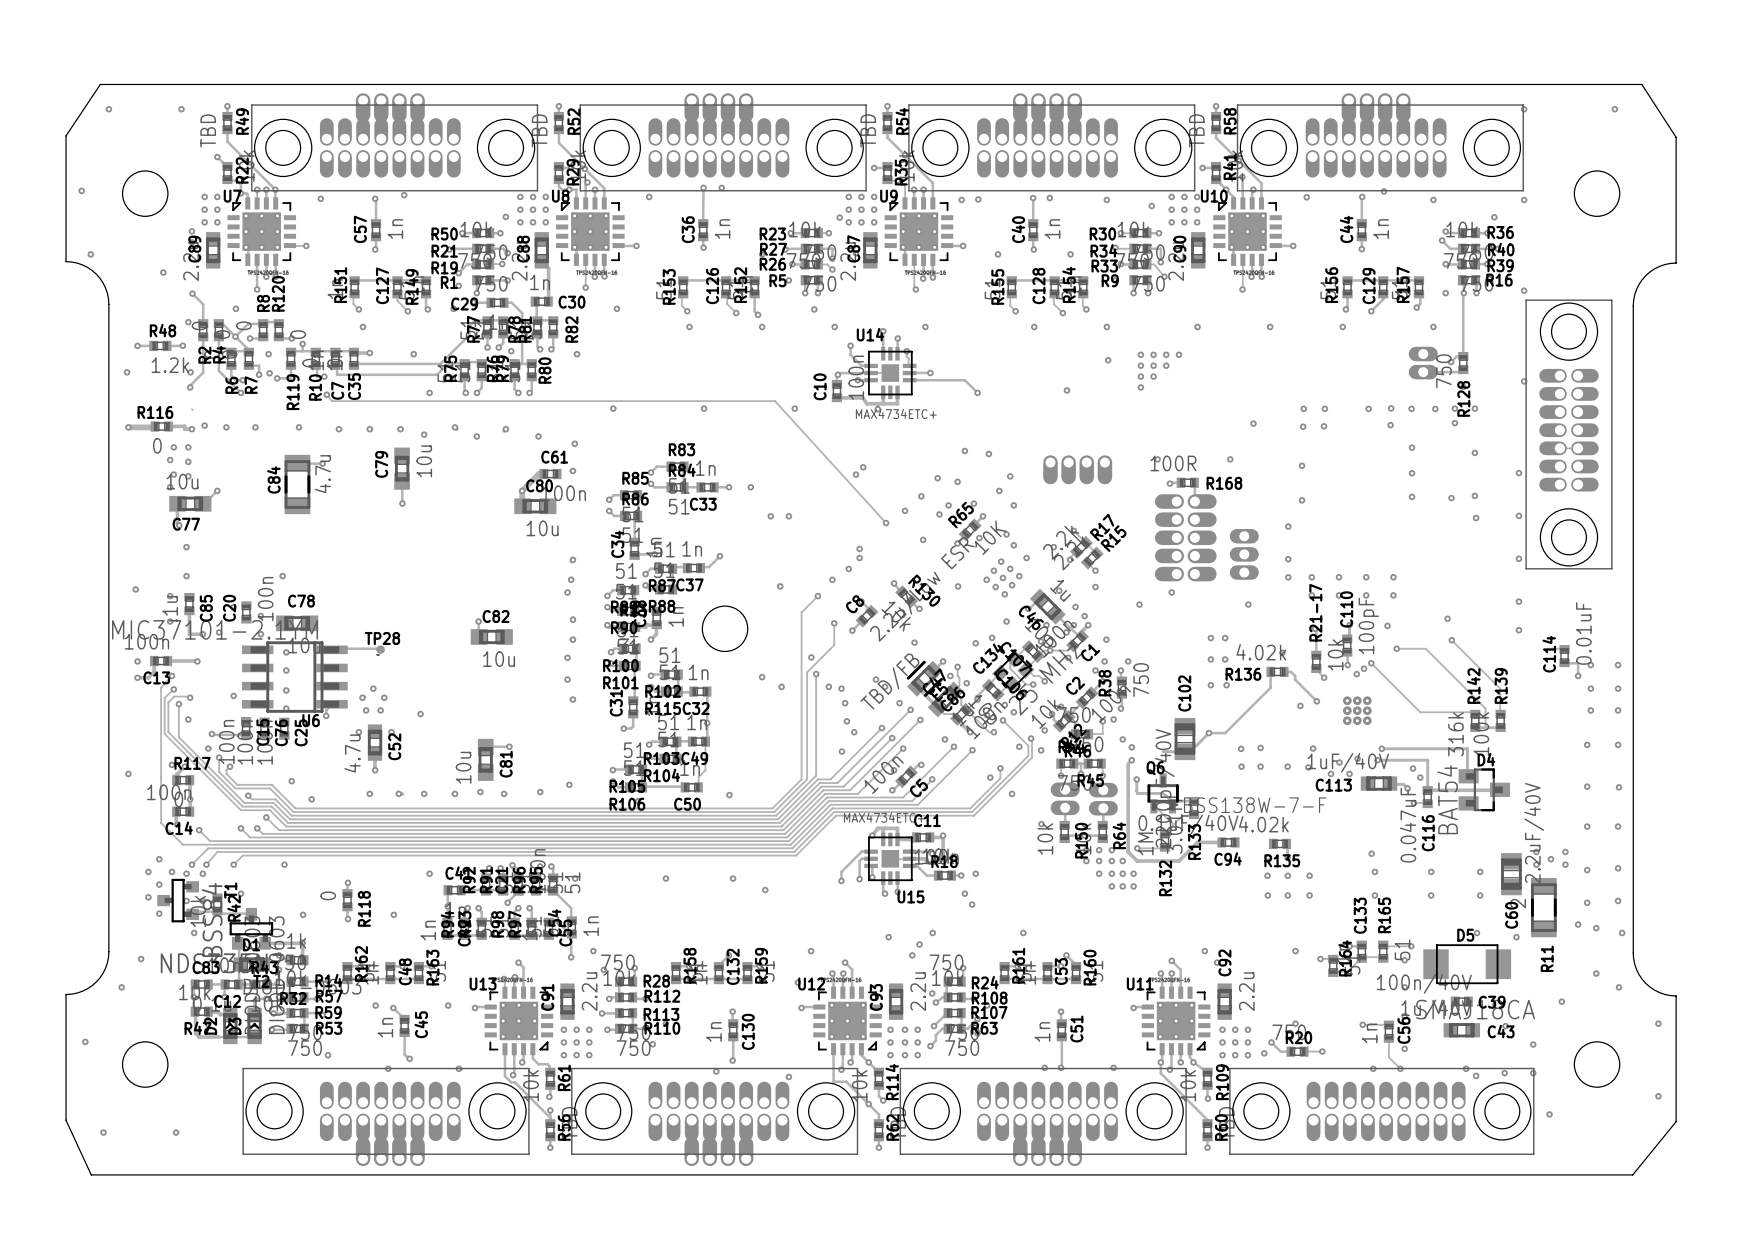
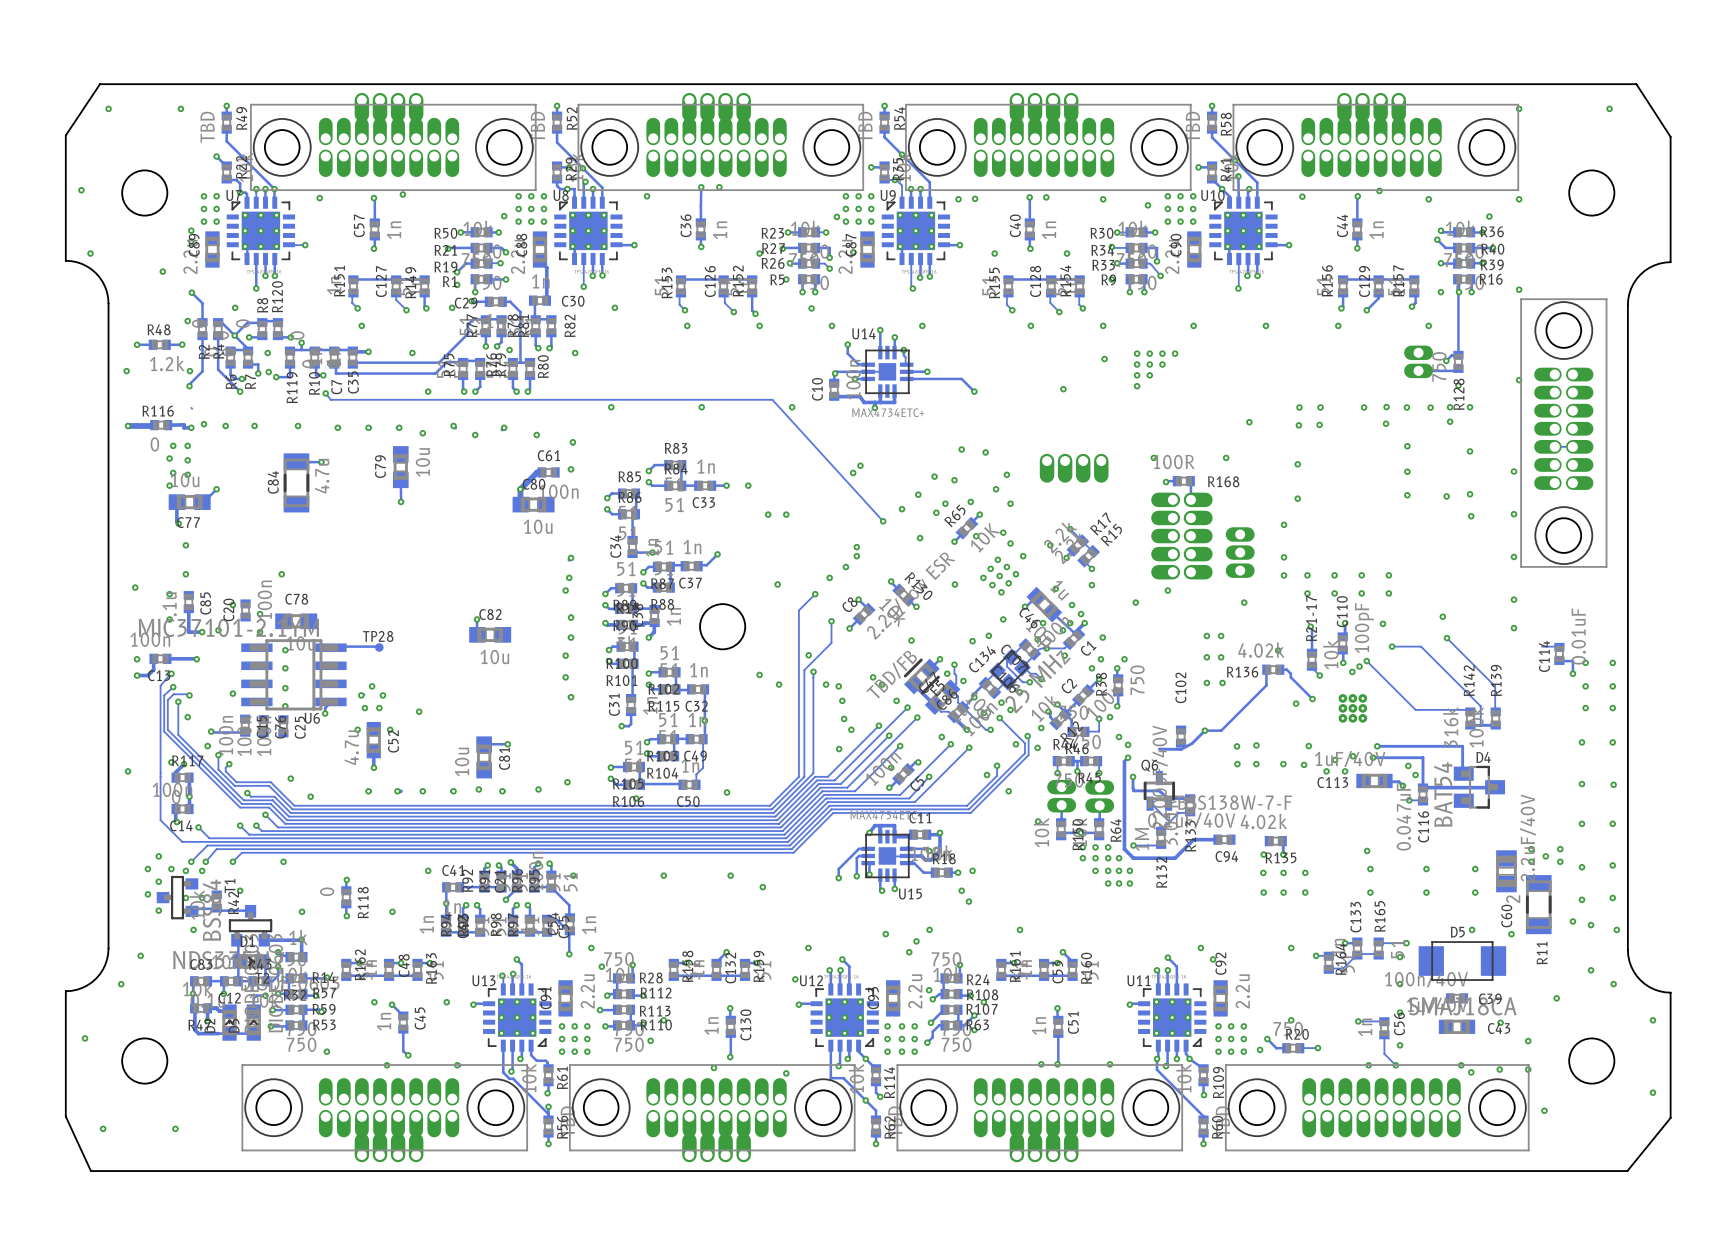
C102 footprint: [1174, 717, 1196, 761] -> [1175, 725, 1187, 748]

